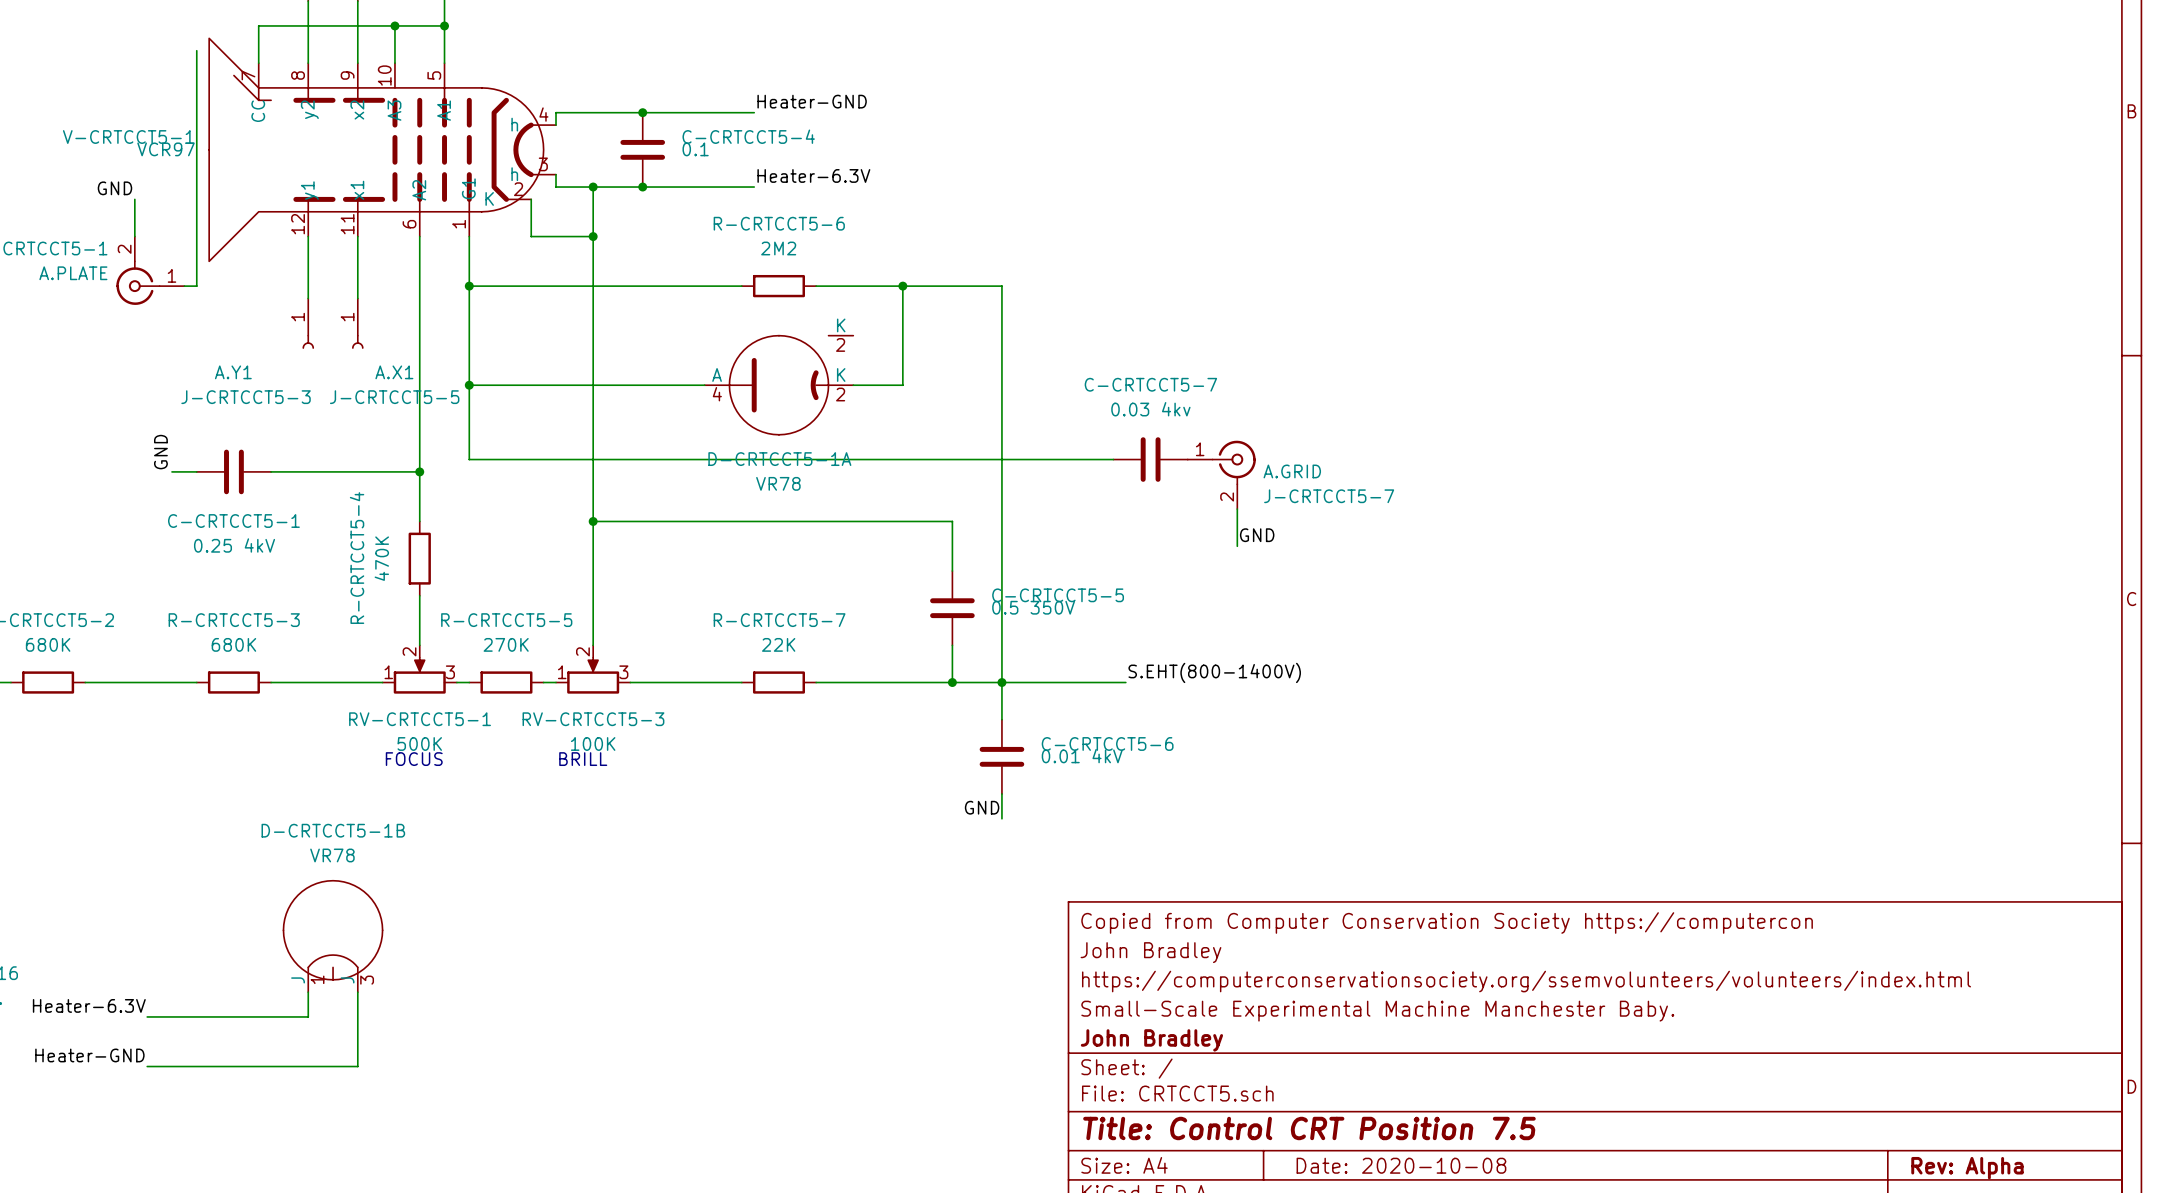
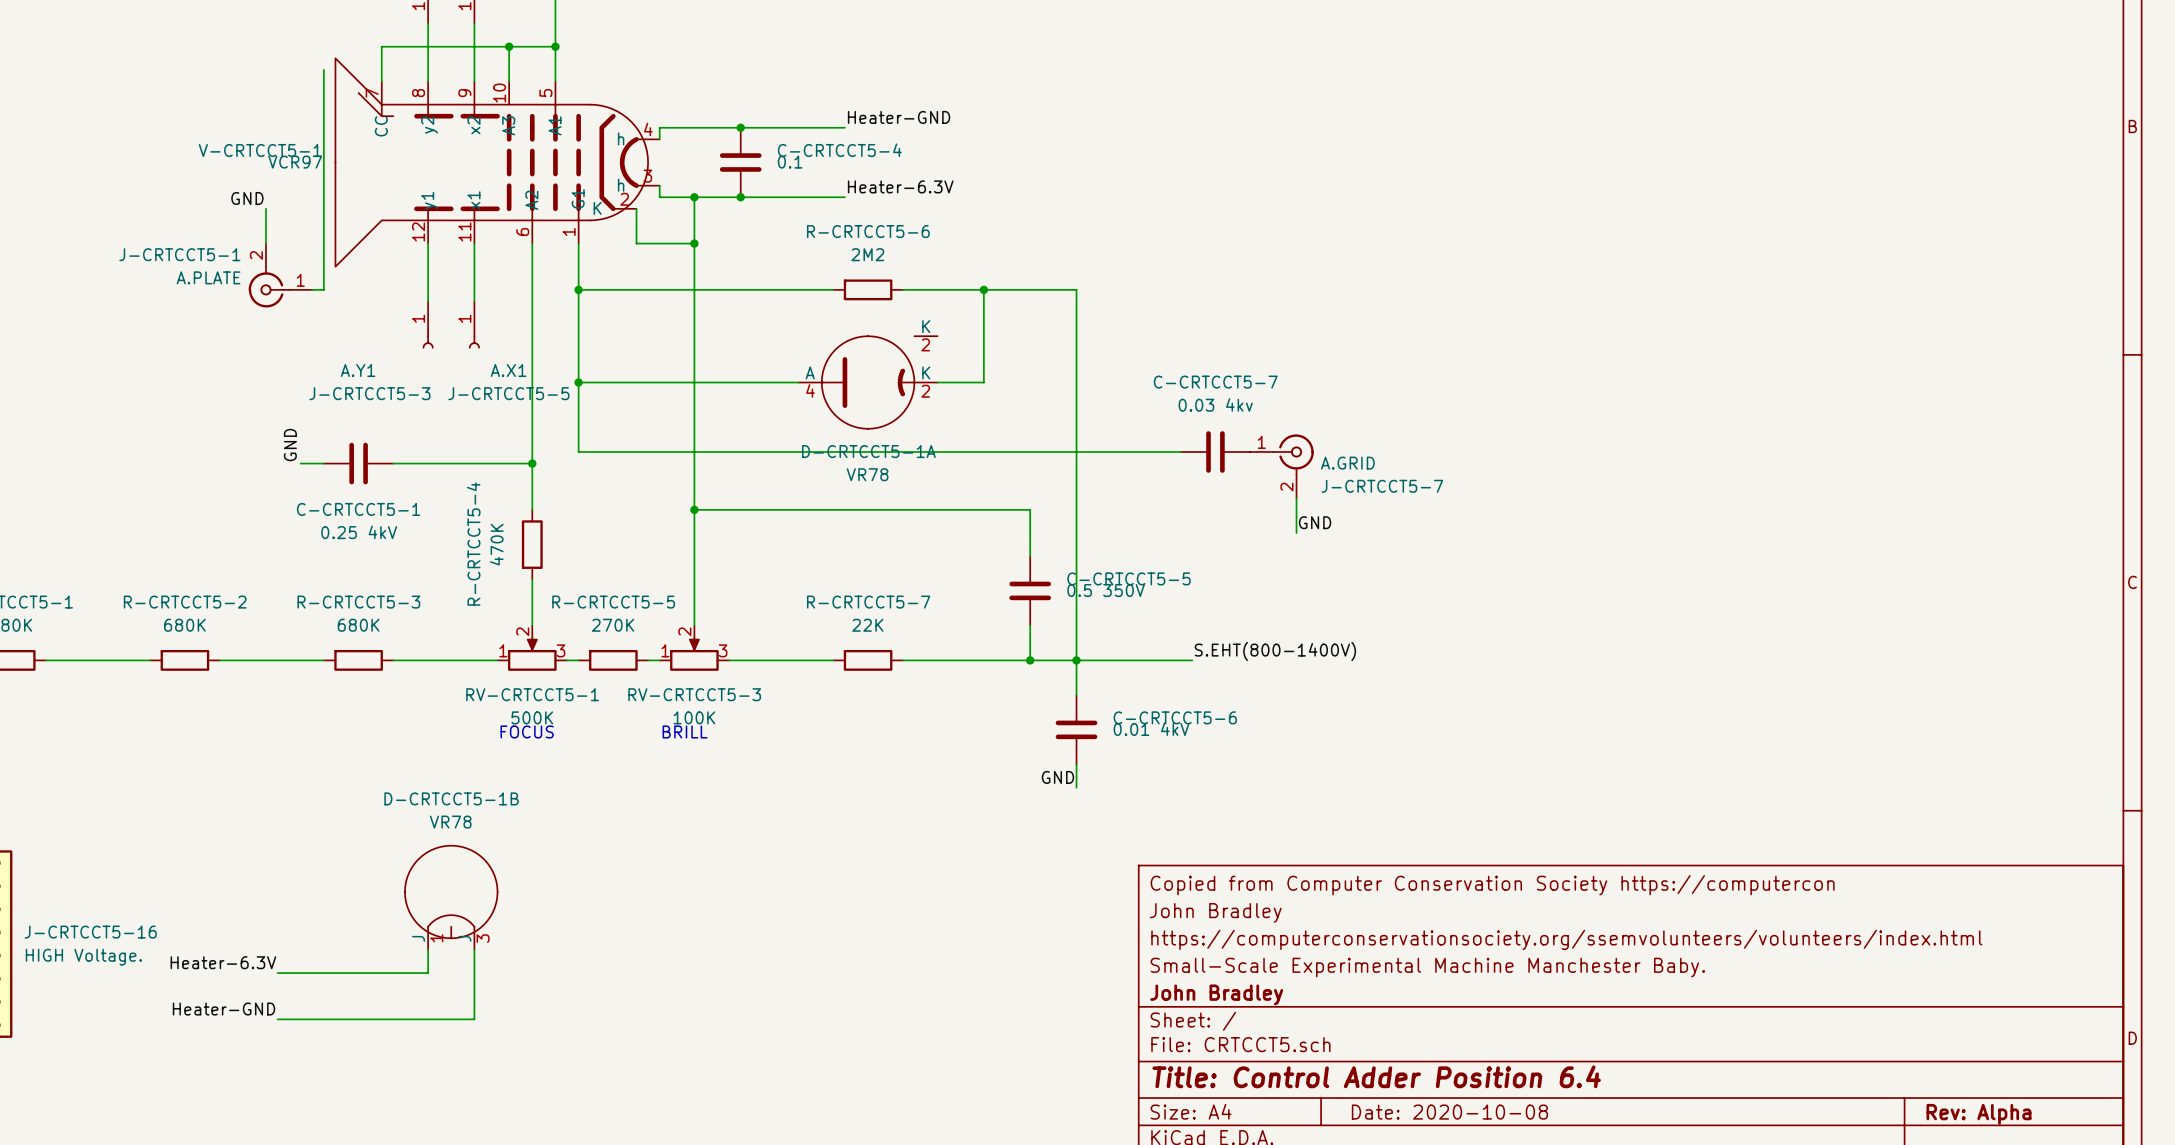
title block: Title: Control CRT Position 7.5 (1309, 1128) -> Title: Control Adder Position 6.4 (1376, 1076)

